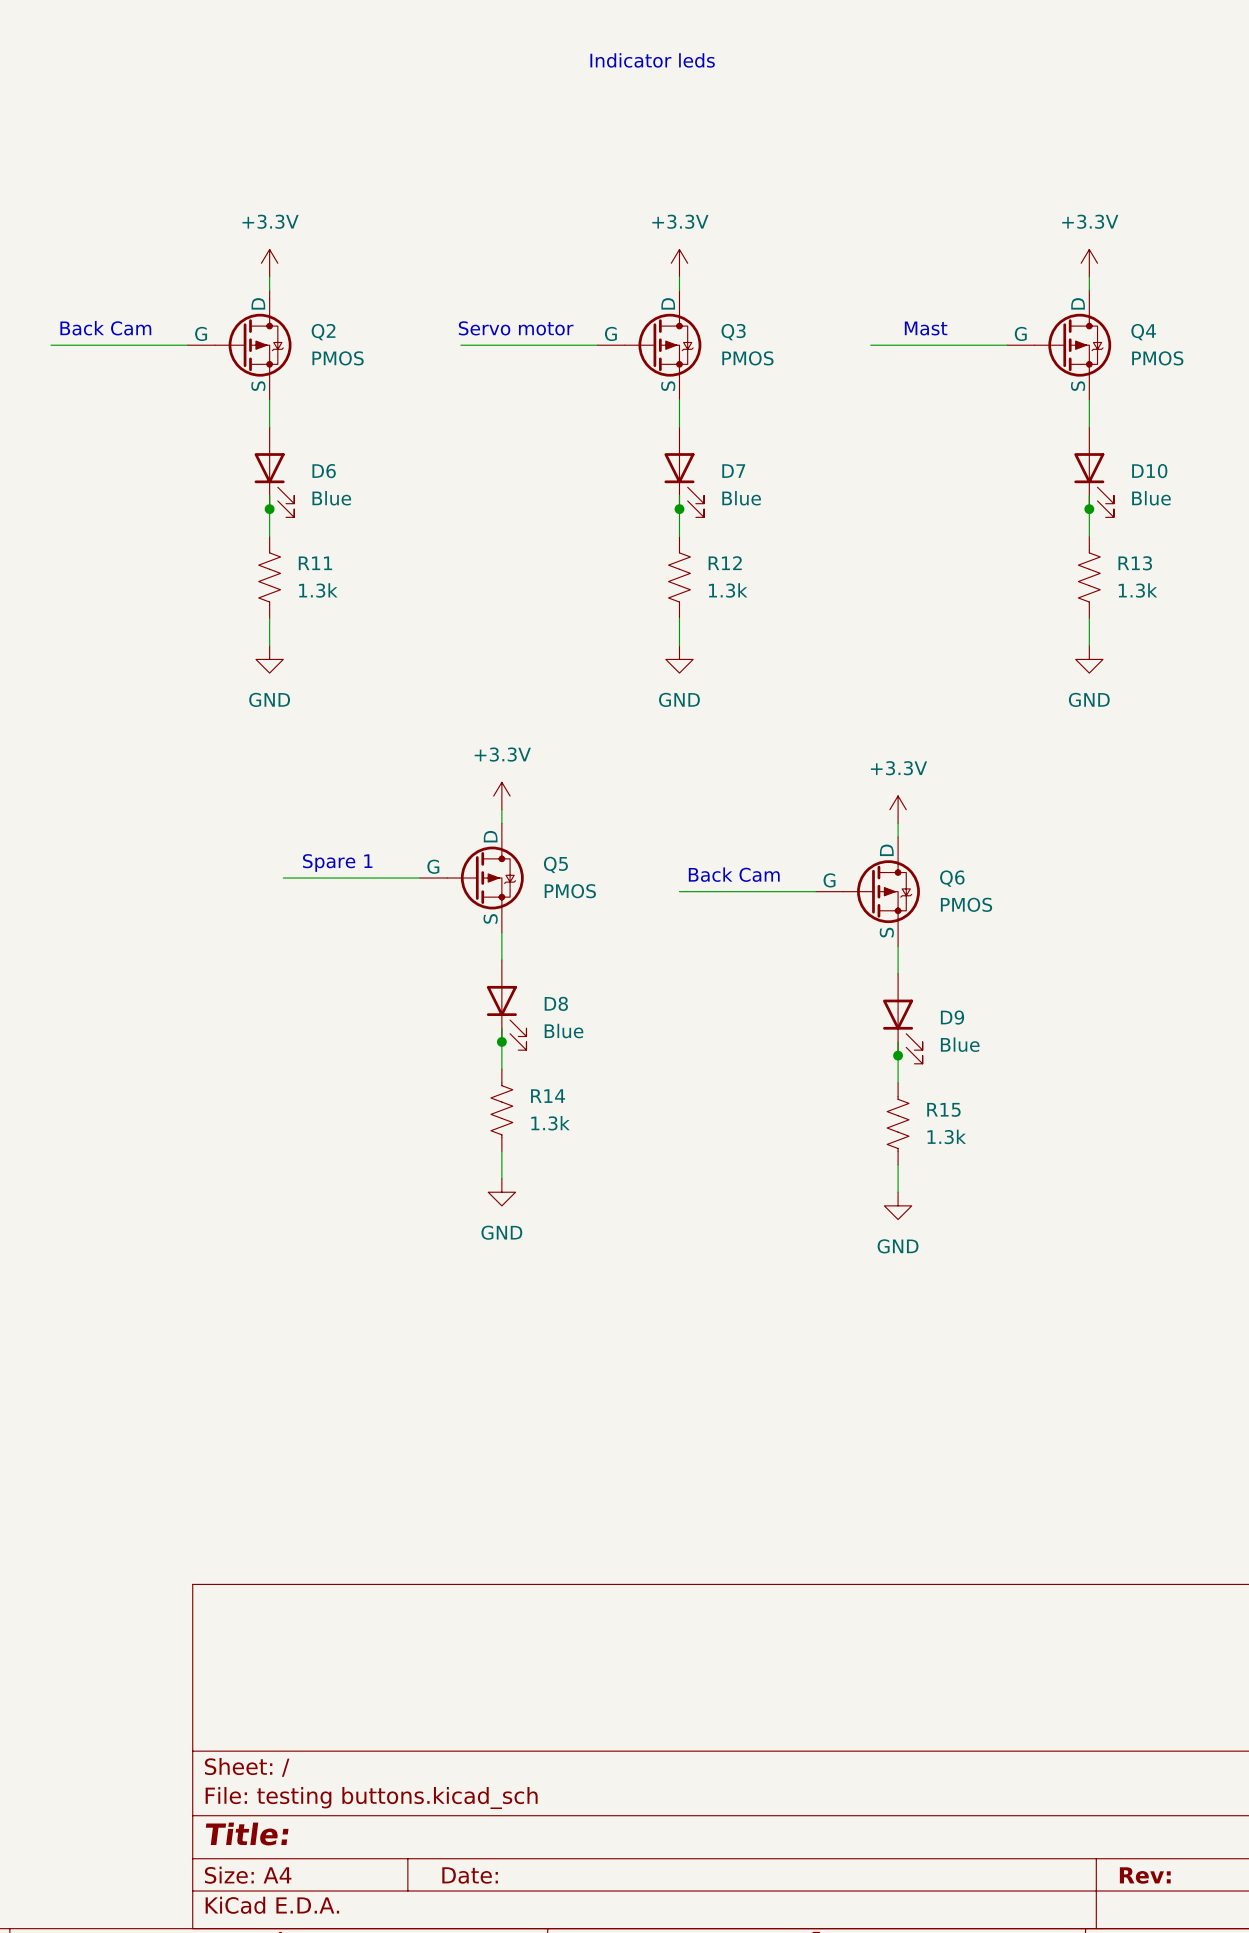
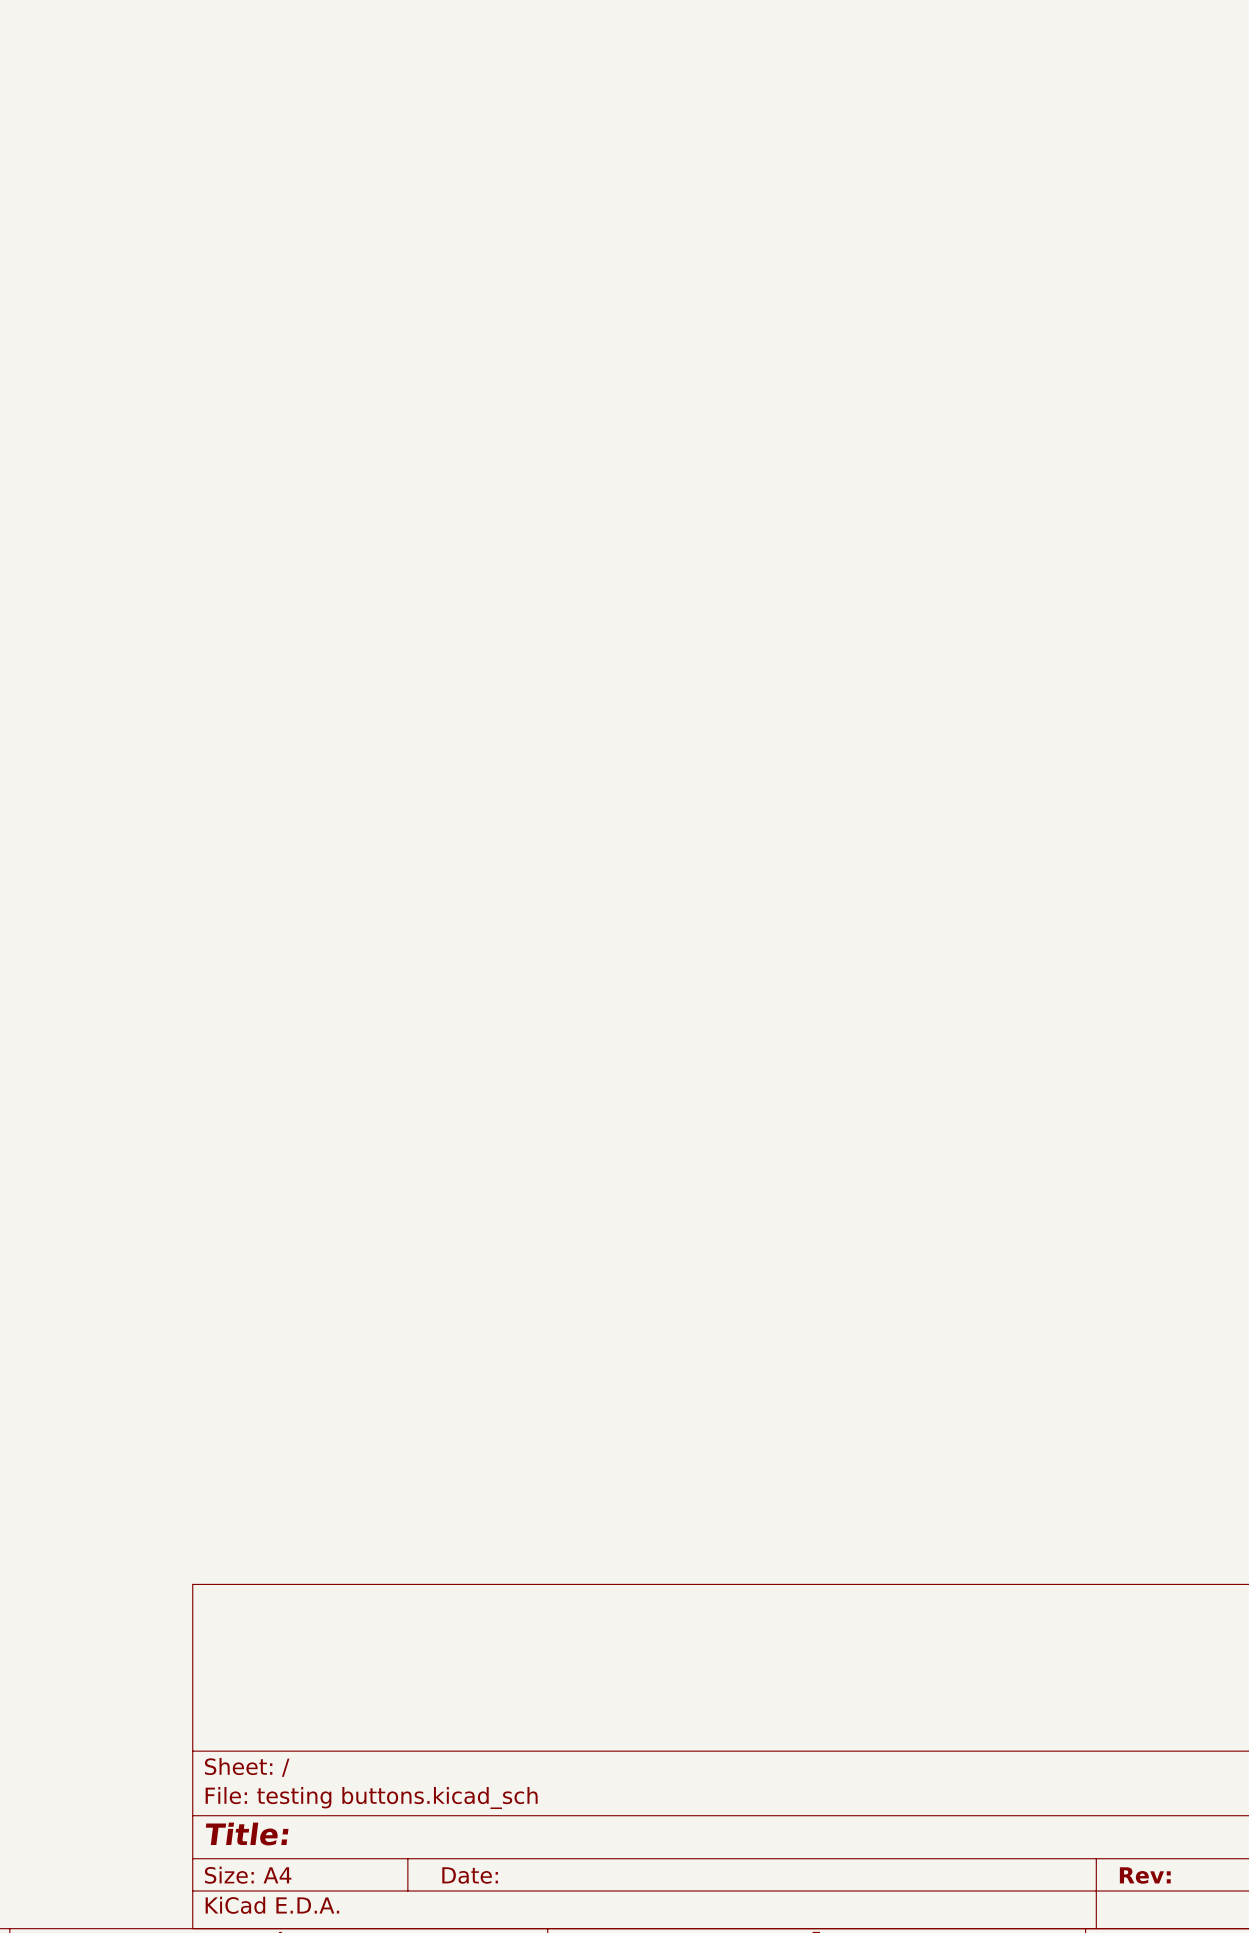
text: Indicator leds (652, 60) -> none
power symbol: +3.3V (269, 263) -> none
power symbol: +3.3V (679, 263) -> none
power symbol: +3.3V (1089, 263) -> none
wire: (269, 276) (269, 290) -> none
wire: (679, 276) (679, 290) -> none
wire: (1089, 276) (1089, 290) -> none
text: Back Cam (105, 328) -> none
text: Servo motor (516, 328) -> none
text: Mast (926, 328) -> none
wire: (51, 345) (187, 345) -> none
Q2: PMOS (239, 345) -> none
wire: (460, 345) (597, 345) -> none
Q3: PMOS (649, 345) -> none
wire: (870, 345) (1007, 345) -> none
Q4: PMOS (1059, 345) -> none
wire: (269, 399) (269, 427) -> none
wire: (679, 399) (679, 427) -> none
wire: (1089, 399) (1089, 427) -> none
D6: Blue (274, 472) -> none
D7: Blue (684, 472) -> none
D10: Blue (1094, 472) -> none
wire: (269, 495) (269, 536) -> none
wire: (679, 495) (679, 536) -> none
wire: (1089, 495) (1089, 536) -> none
junction: (269, 509) -> none
junction: (679, 509) -> none
junction: (1089, 509) -> none
R11: 1.3k (269, 577) -> none
R12: 1.3k (679, 577) -> none
R13: 1.3k (1089, 577) -> none
wire: (269, 618) (269, 645) -> none
wire: (679, 618) (679, 645) -> none
wire: (1089, 618) (1089, 645) -> none
power symbol: GND (269, 659) -> none
power symbol: GND (679, 659) -> none
power symbol: GND (1089, 659) -> none
power symbol: +3.3V (501, 796) -> none
wire: (501, 809) (501, 823) -> none
power symbol: +3.3V (898, 809) -> none
wire: (898, 823) (898, 837) -> none
text: Spare 1 (337, 862) -> none
text: Back Cam (734, 874) -> none
wire: (283, 878) (419, 878) -> none
Q5: PMOS (471, 878) -> none
wire: (679, 891) (816, 891) -> none
Q6: PMOS (868, 891) -> none
wire: (501, 932) (501, 959) -> none
wire: (898, 946) (898, 973) -> none
D8: Blue (506, 1005) -> none
D9: Blue (902, 1018) -> none
wire: (501, 1028) (501, 1069) -> none
junction: (501, 1041) -> none
wire: (898, 1041) (898, 1082) -> none
junction: (898, 1055) -> none
R14: 1.3k (501, 1110) -> none
R15: 1.3k (898, 1123) -> none
wire: (501, 1151) (501, 1178) -> none
wire: (898, 1164) (898, 1192) -> none
power symbol: GND (501, 1192) -> none
power symbol: GND (898, 1205) -> none

